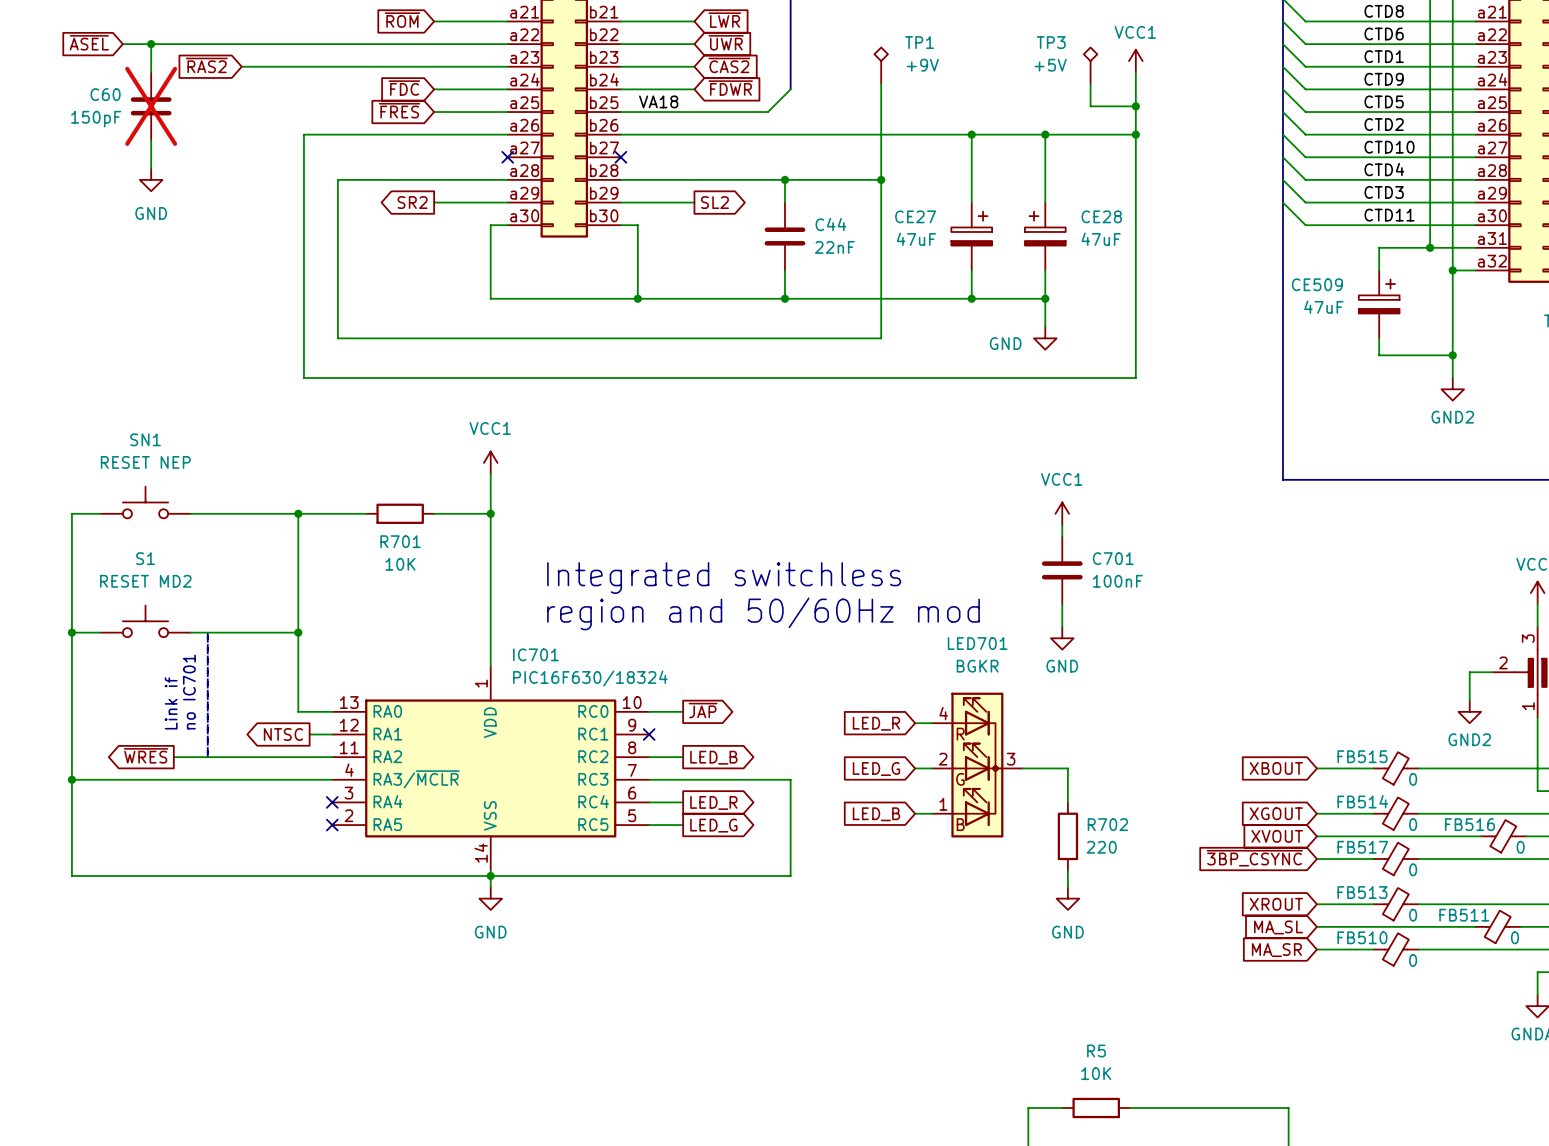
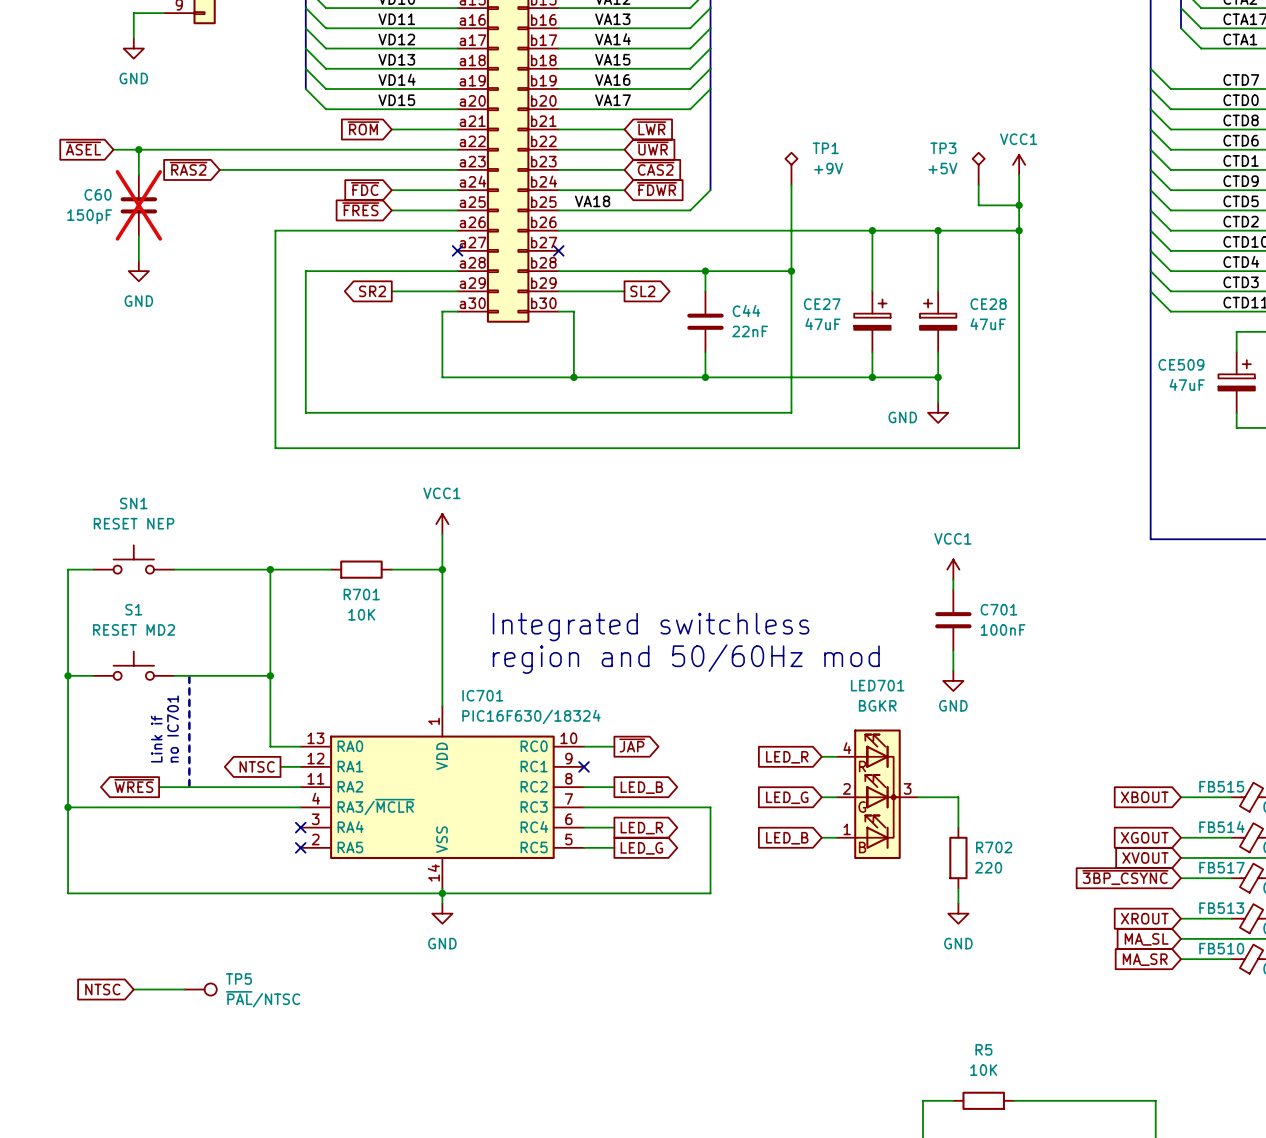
global label: none -> NTSC (102, 989)
wire: none -> (133, 989) (184, 989)
TP5: none -> ~{PAL}/NTSC (200, 989)

